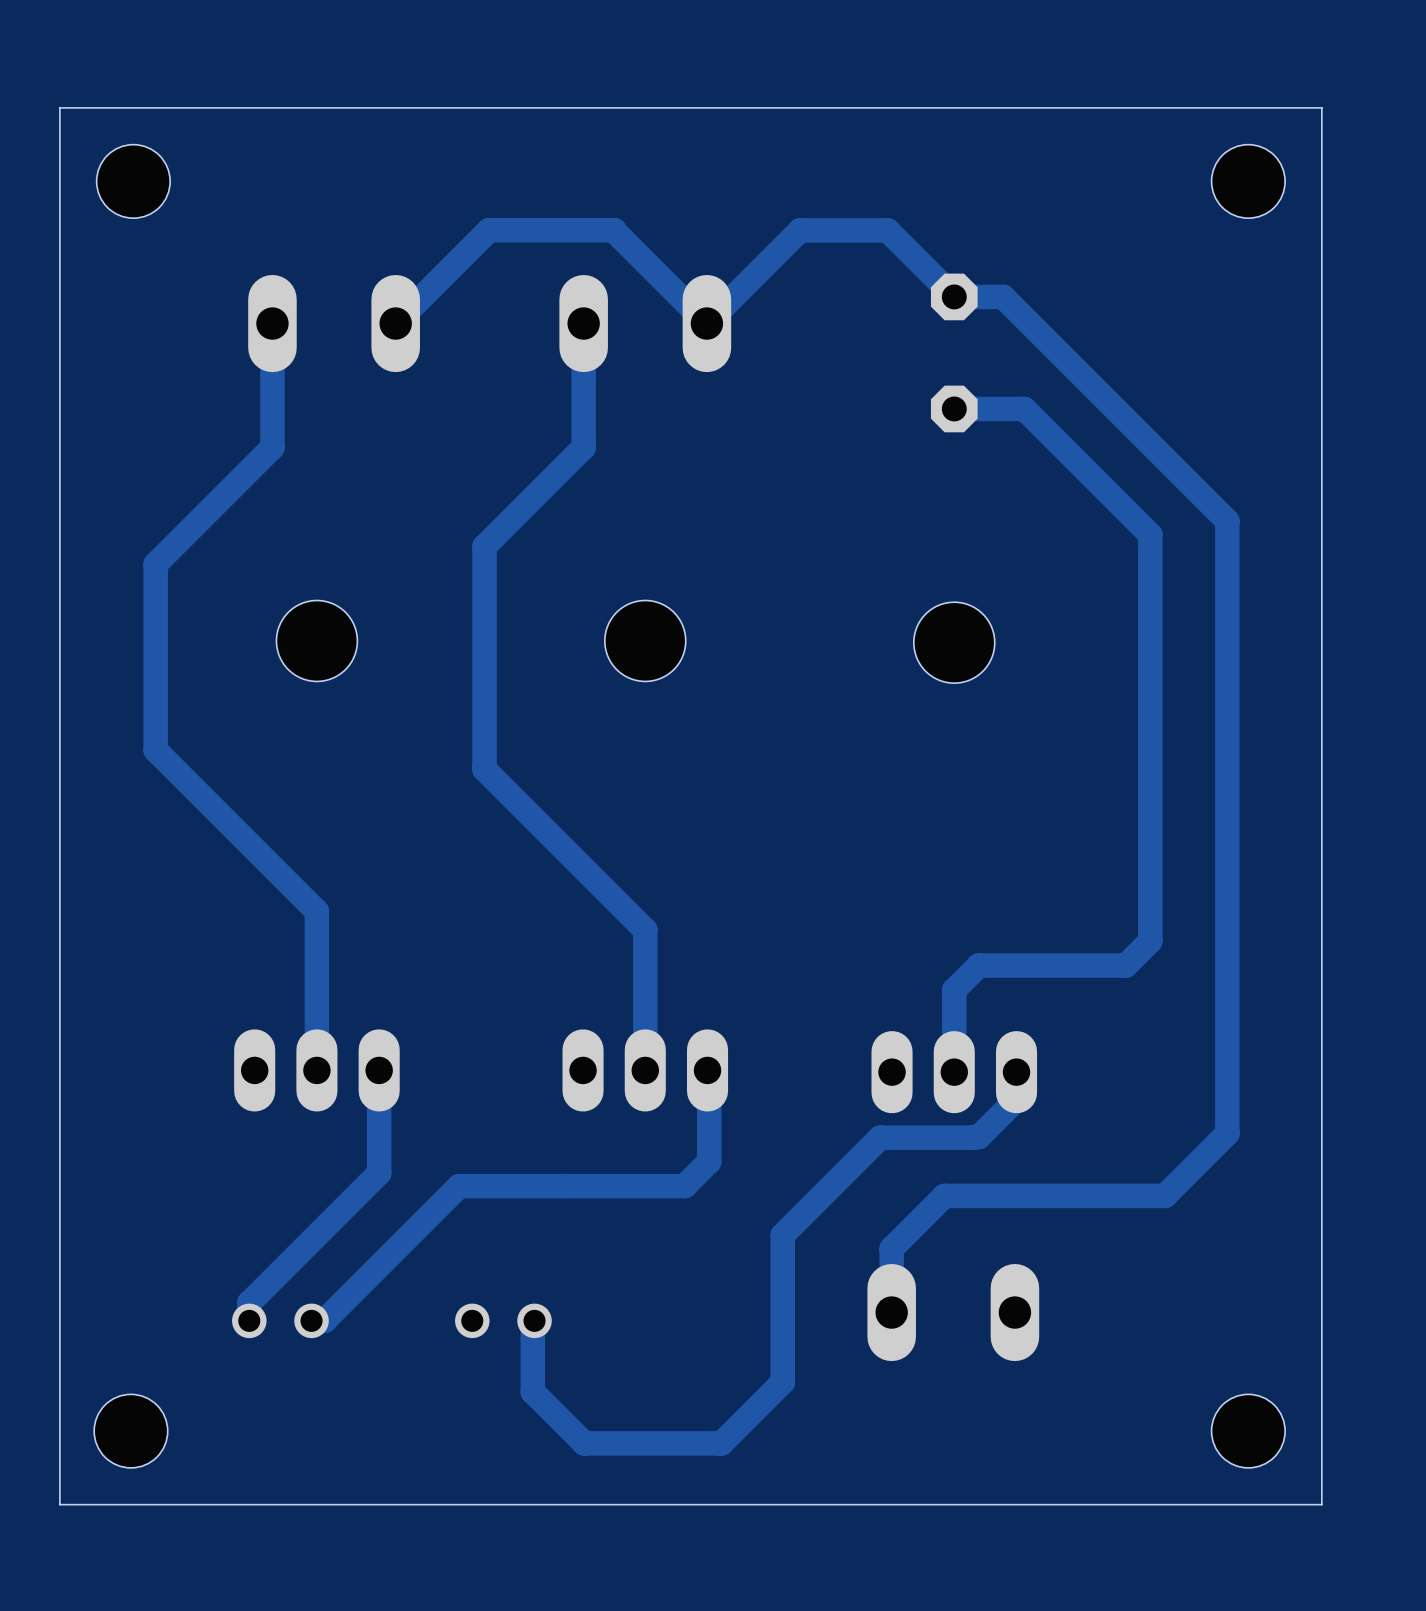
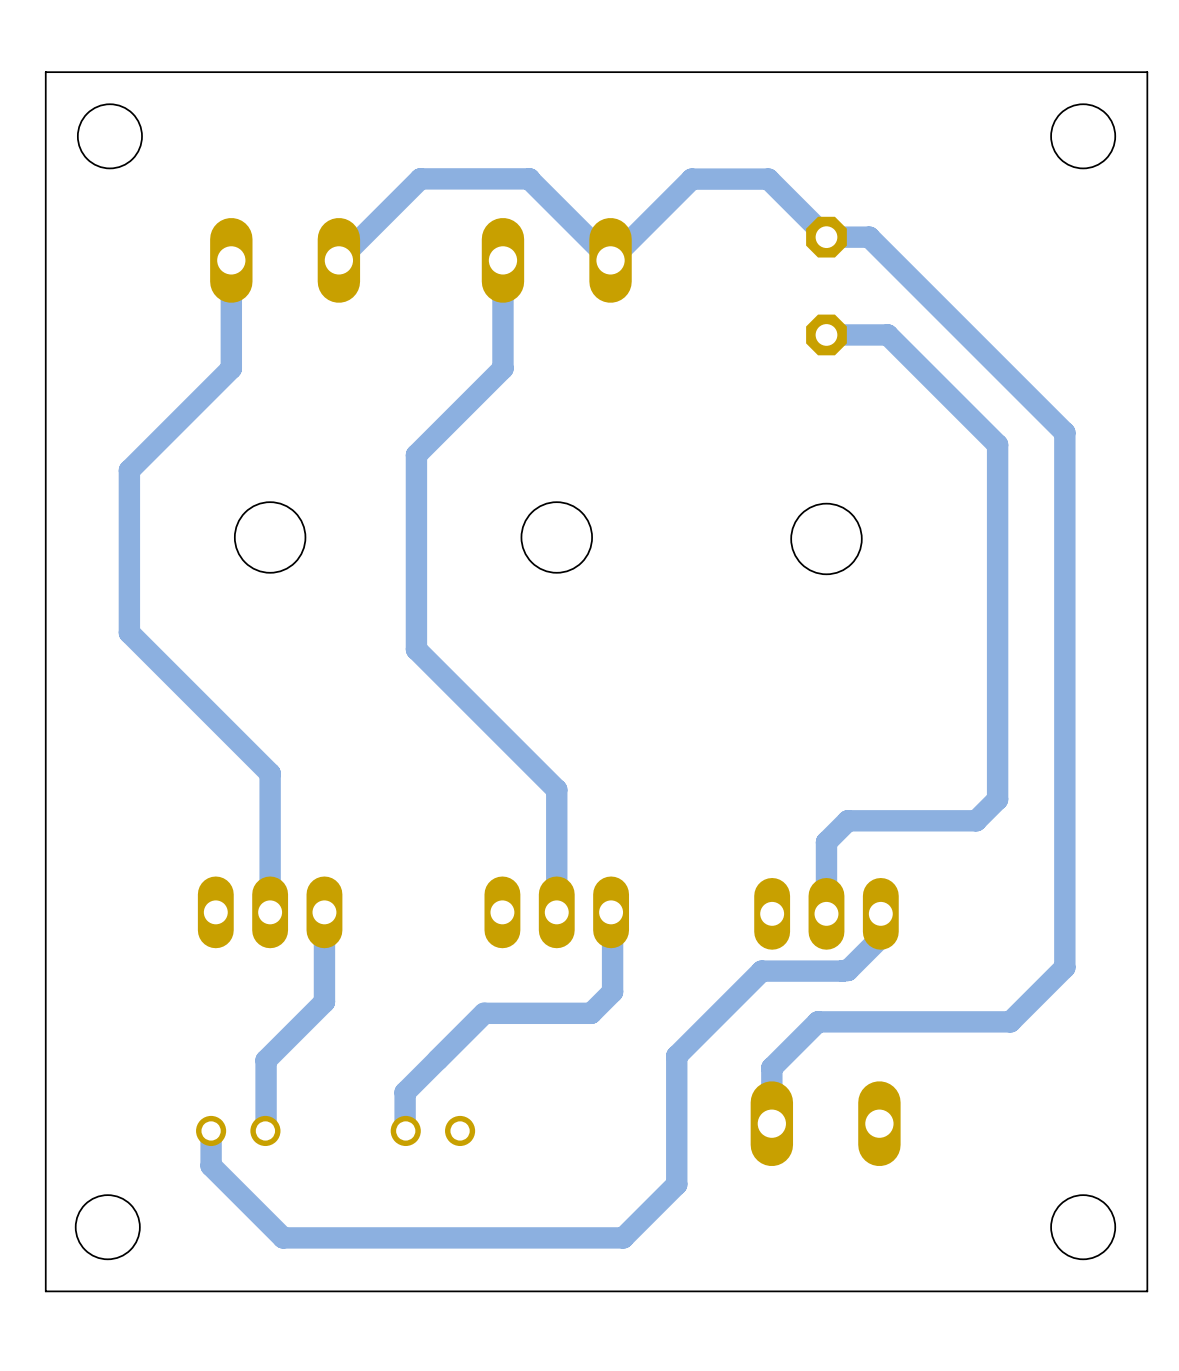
track: (562, 1186) (459, 1186) (324, 1320) (311, 1320) -> (484, 1013) (405, 1092) (405, 1130)
track: (312, 1240) (249, 1302) (249, 1320) -> (266, 1060) (265, 1130)
track: (534, 1320) (532, 1322) (532, 1391) (584, 1443) -> (211, 1130) (211, 1165) (283, 1237) (503, 1237)

